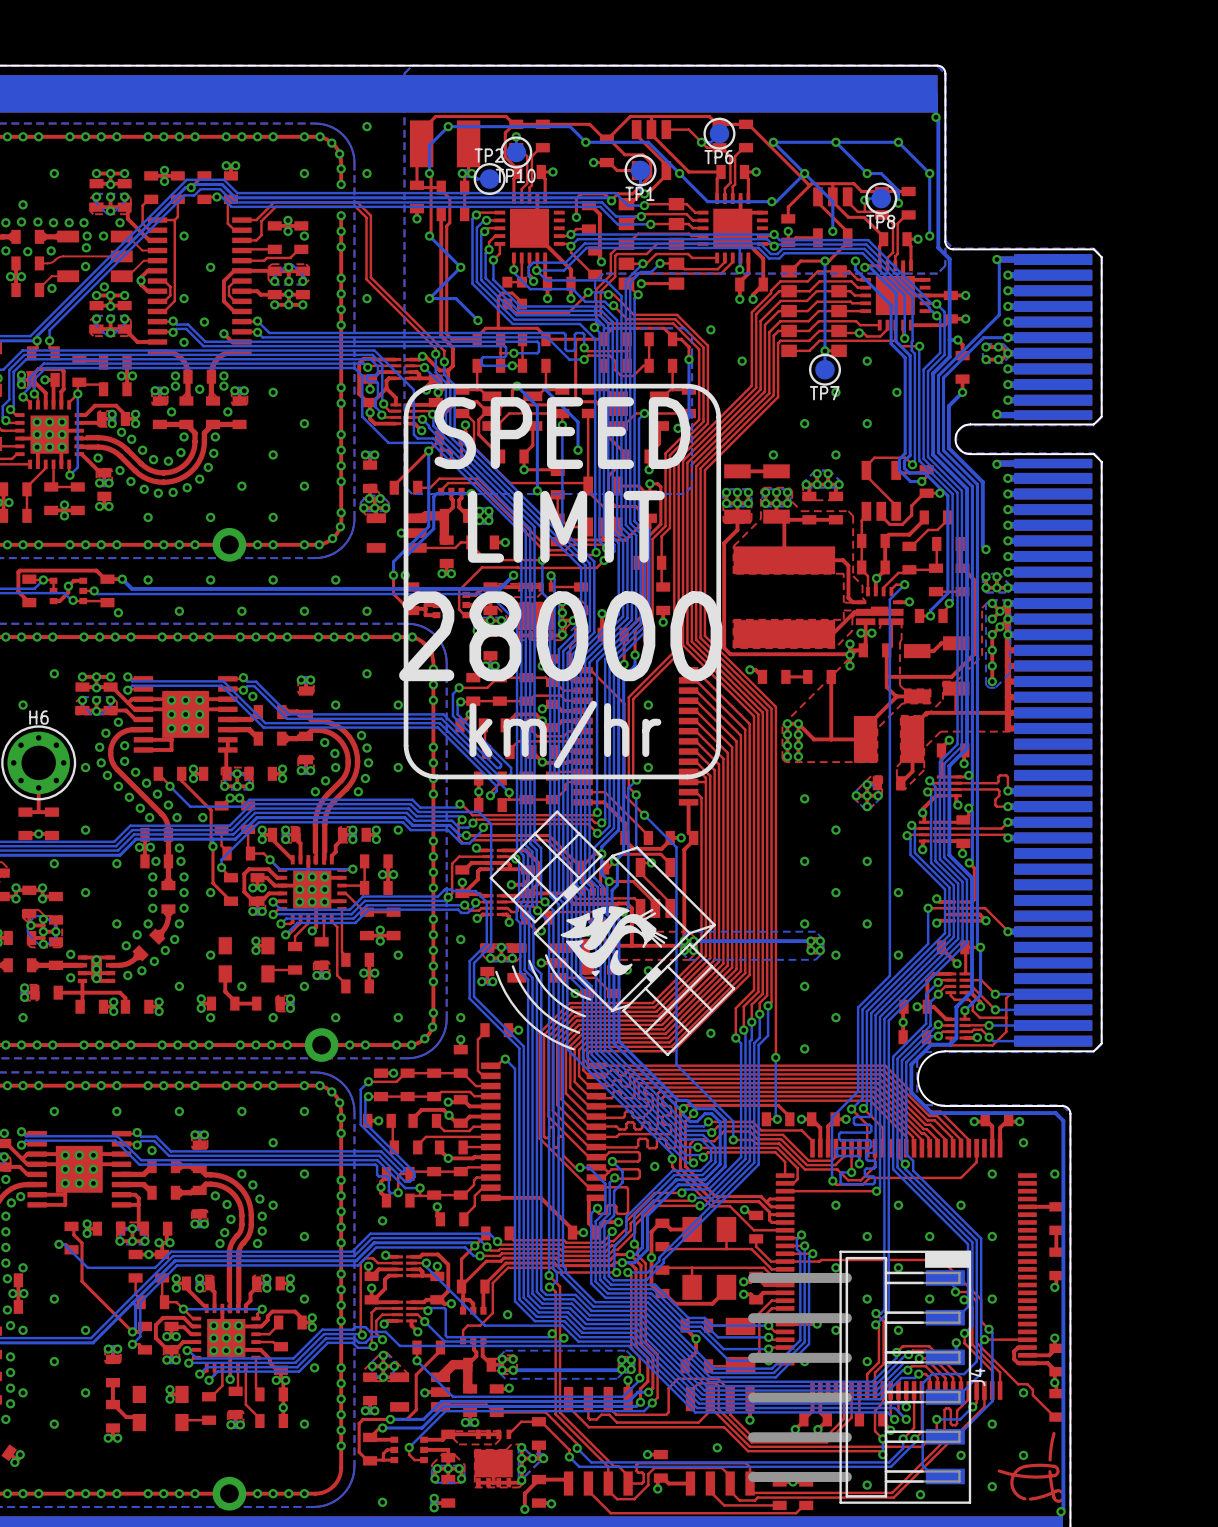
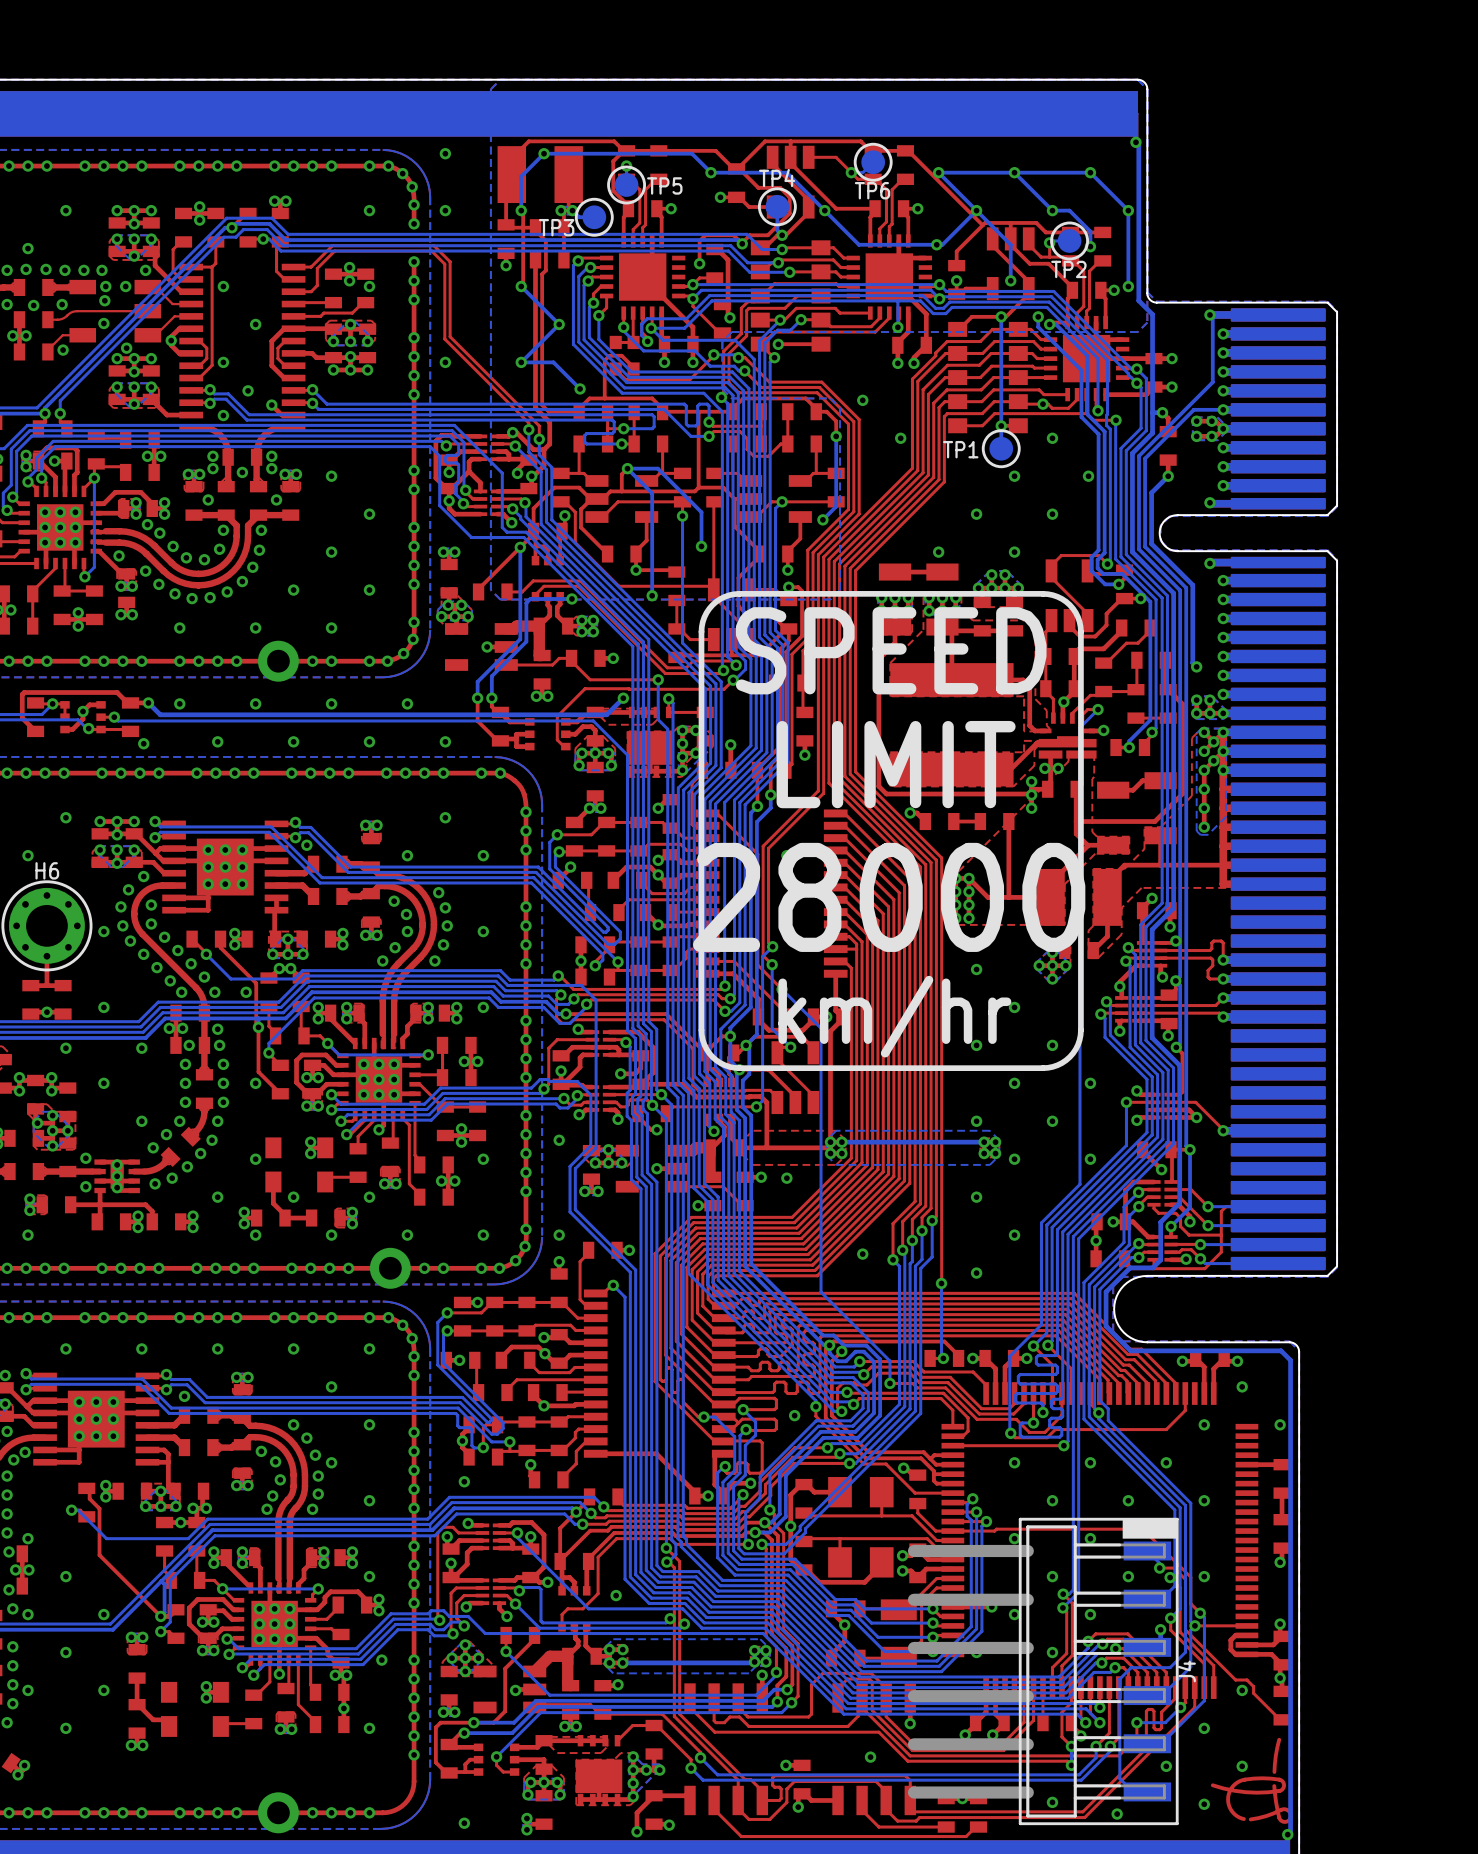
TP2 name: TP2 (489, 155) -> TP3 (556, 227)
TP10 name: TP10 (515, 175) -> TP5 (664, 185)
TP1 name: TP1 (640, 193) -> TP4 (777, 178)
TP8 name: TP8 (880, 222) -> TP2 (1068, 269)
TP7 name: TP7 (824, 393) -> TP1 (960, 449)
drawing position: (562, 581) -> (891, 831)
drawing: [489, 810, 736, 1057] -> none

